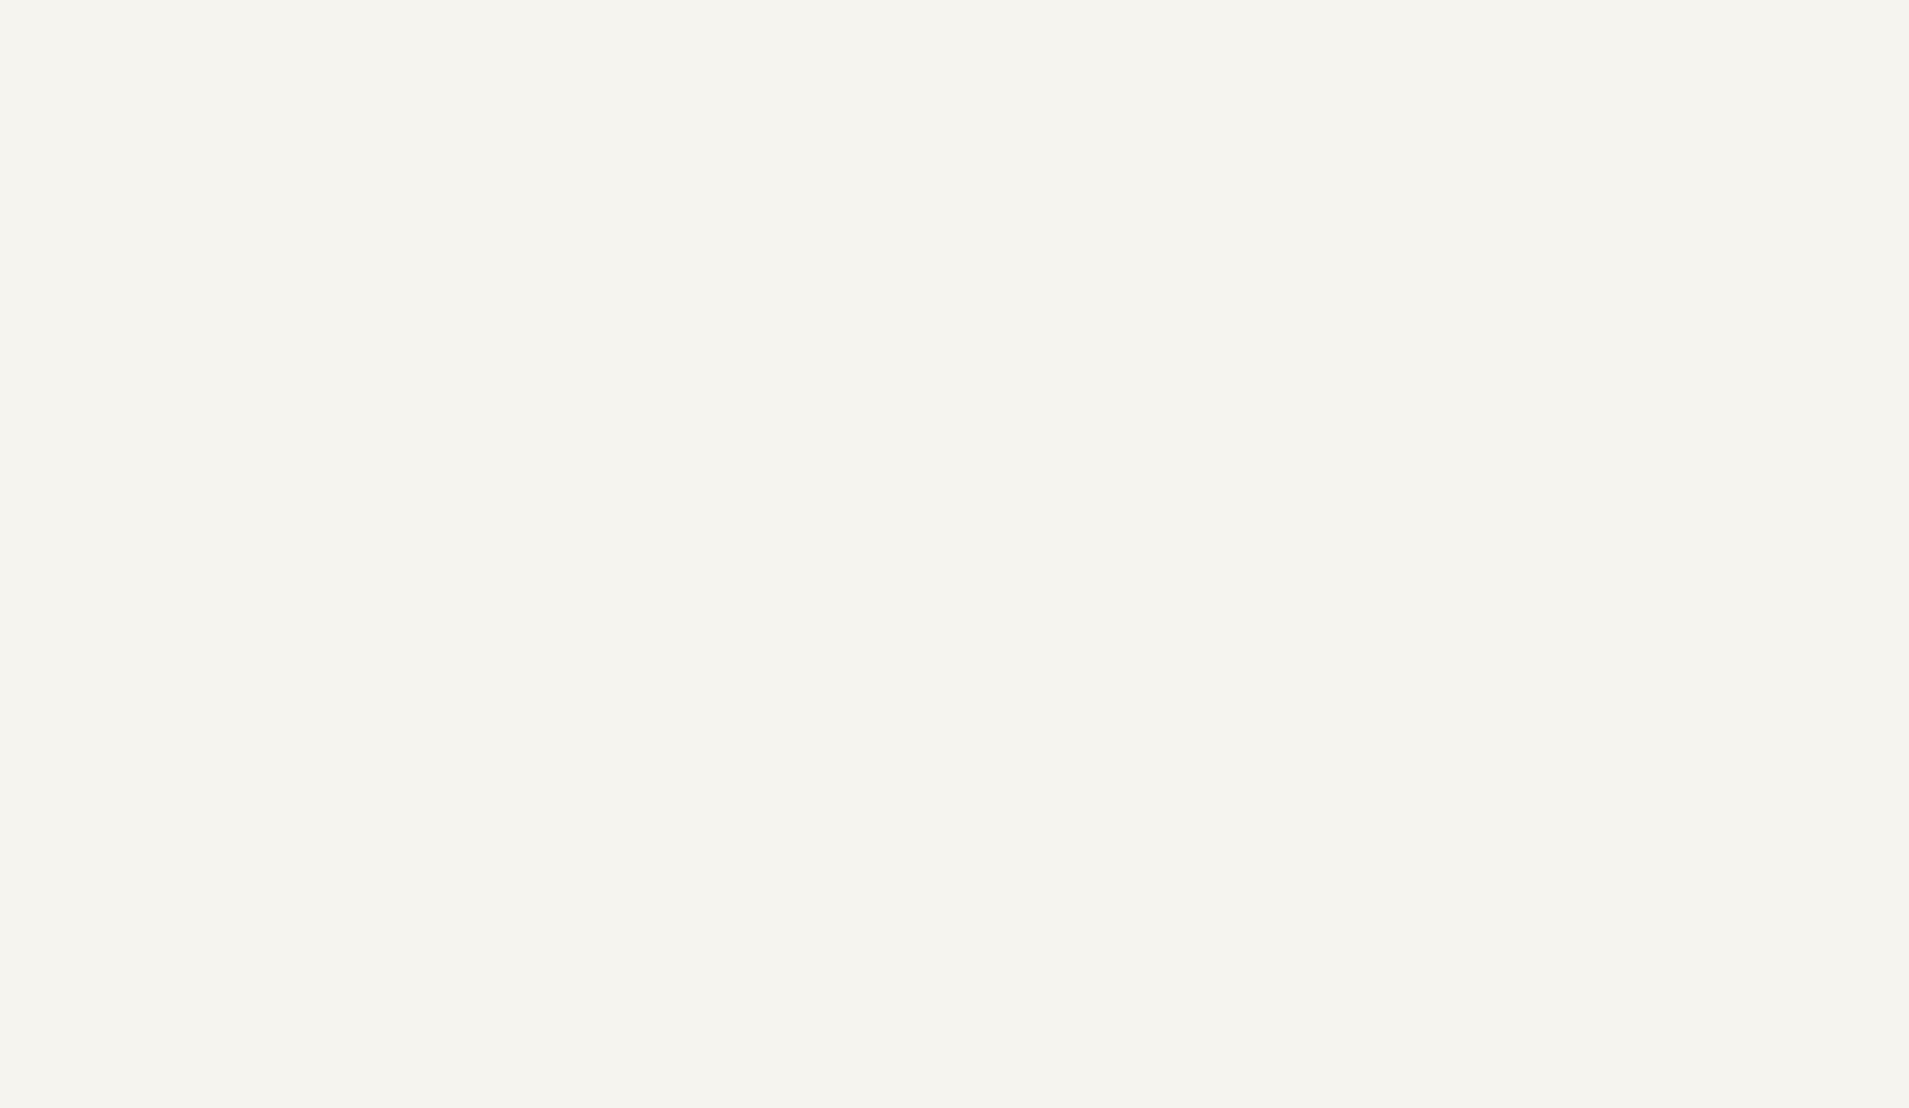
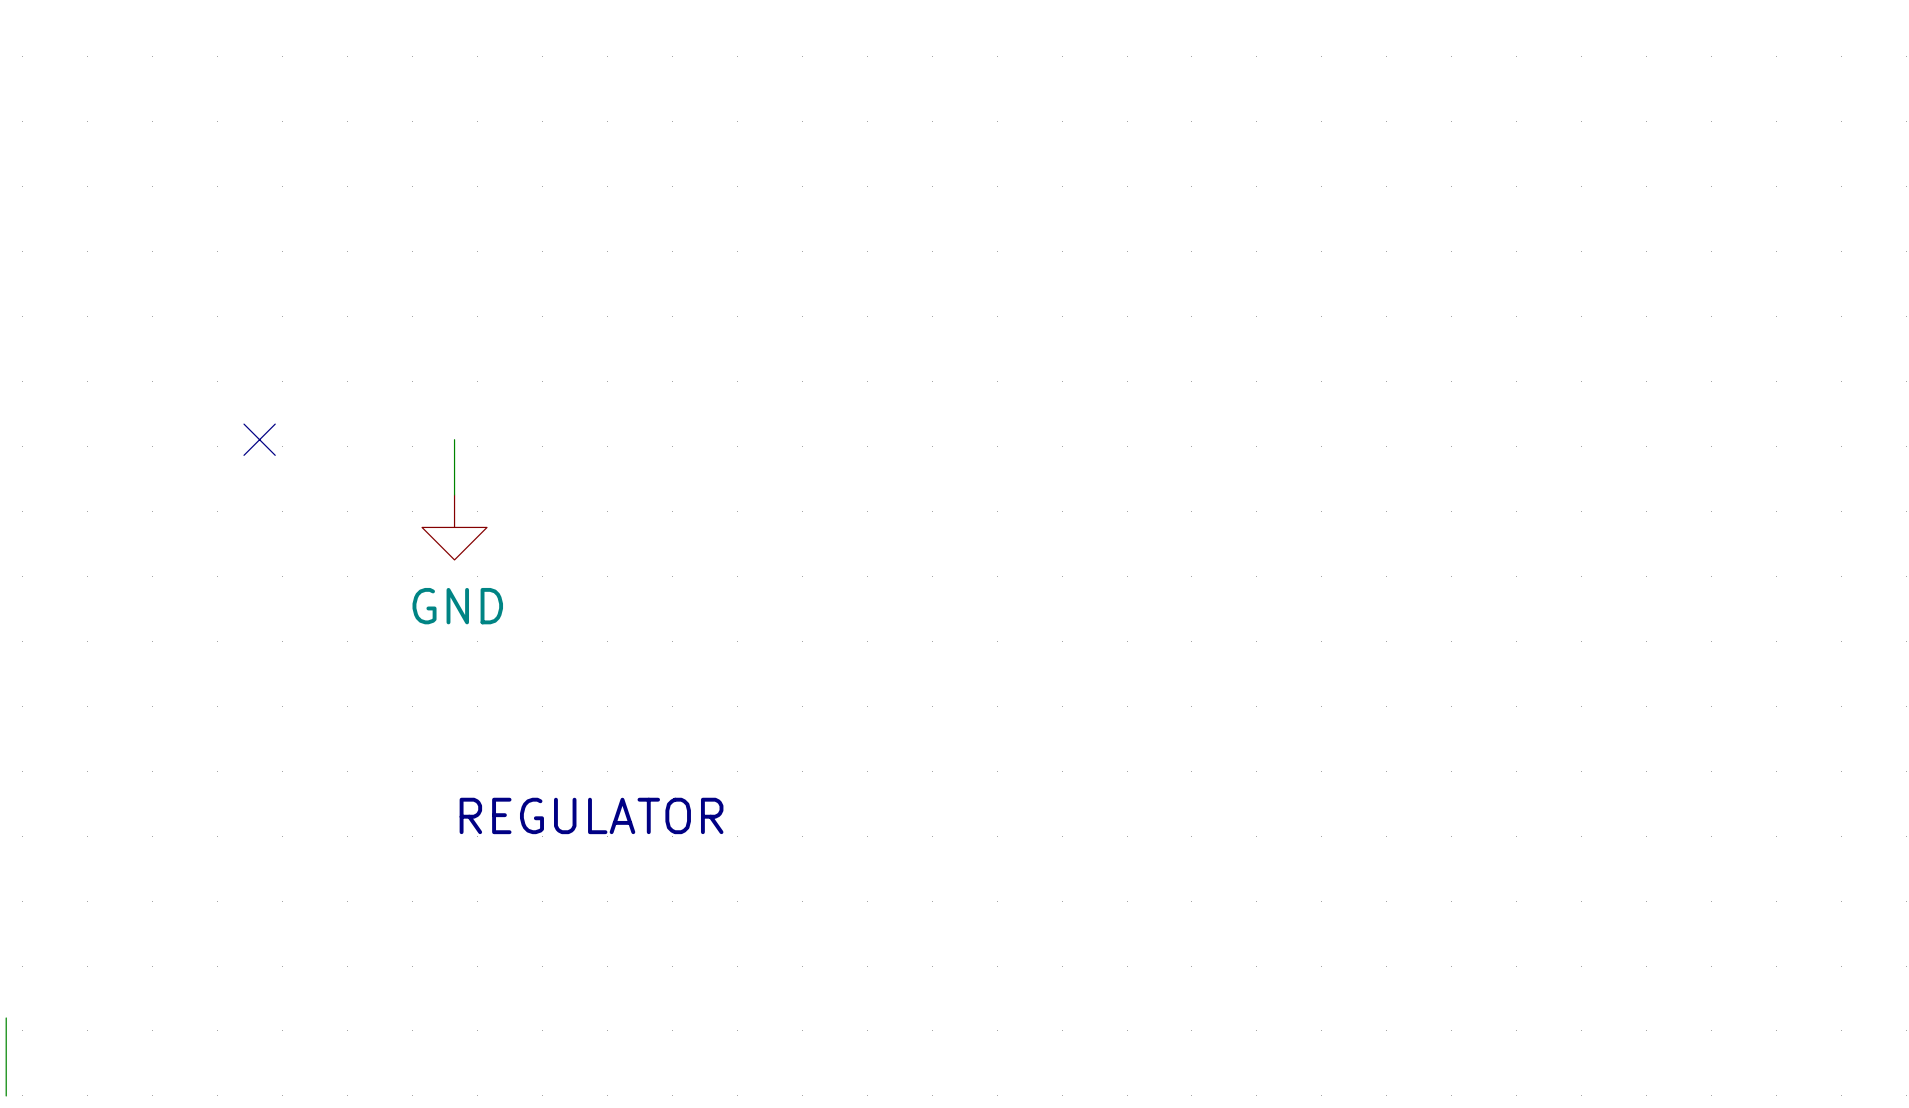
no-connect mark: none -> (259, 439)
wire: none -> (454, 439) (454, 494)
power symbol: none -> GND (454, 527)
text: none -> REGULATOR (591, 815)
wire: none -> (6, 1017) (6, 1095)

